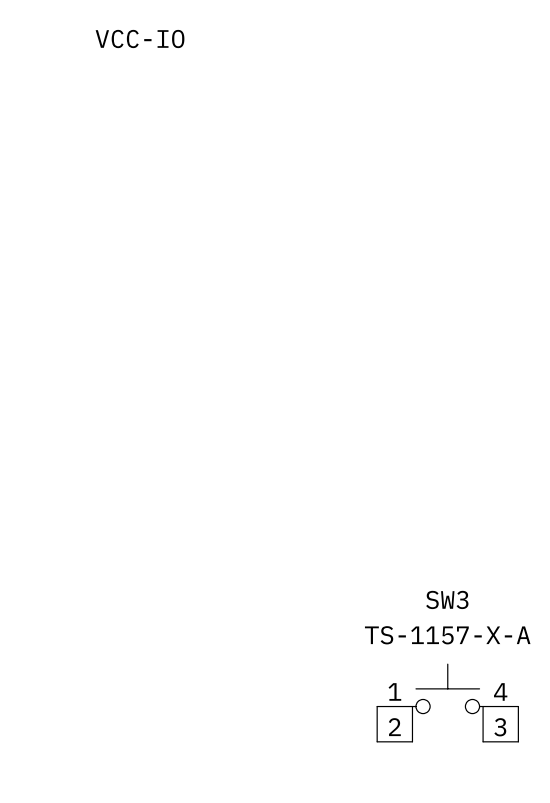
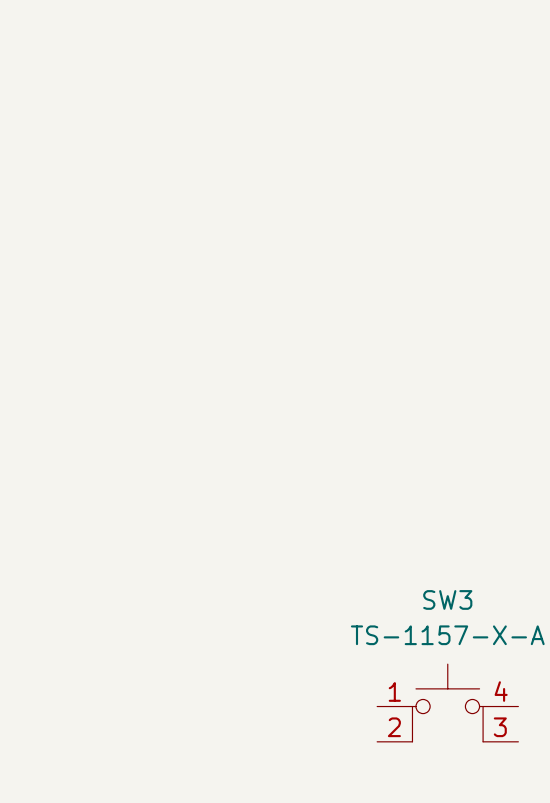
text: VCC-IO (140, 39) -> none
wire: (377, 706) (377, 741) -> none
wire: (518, 706) (518, 741) -> none

